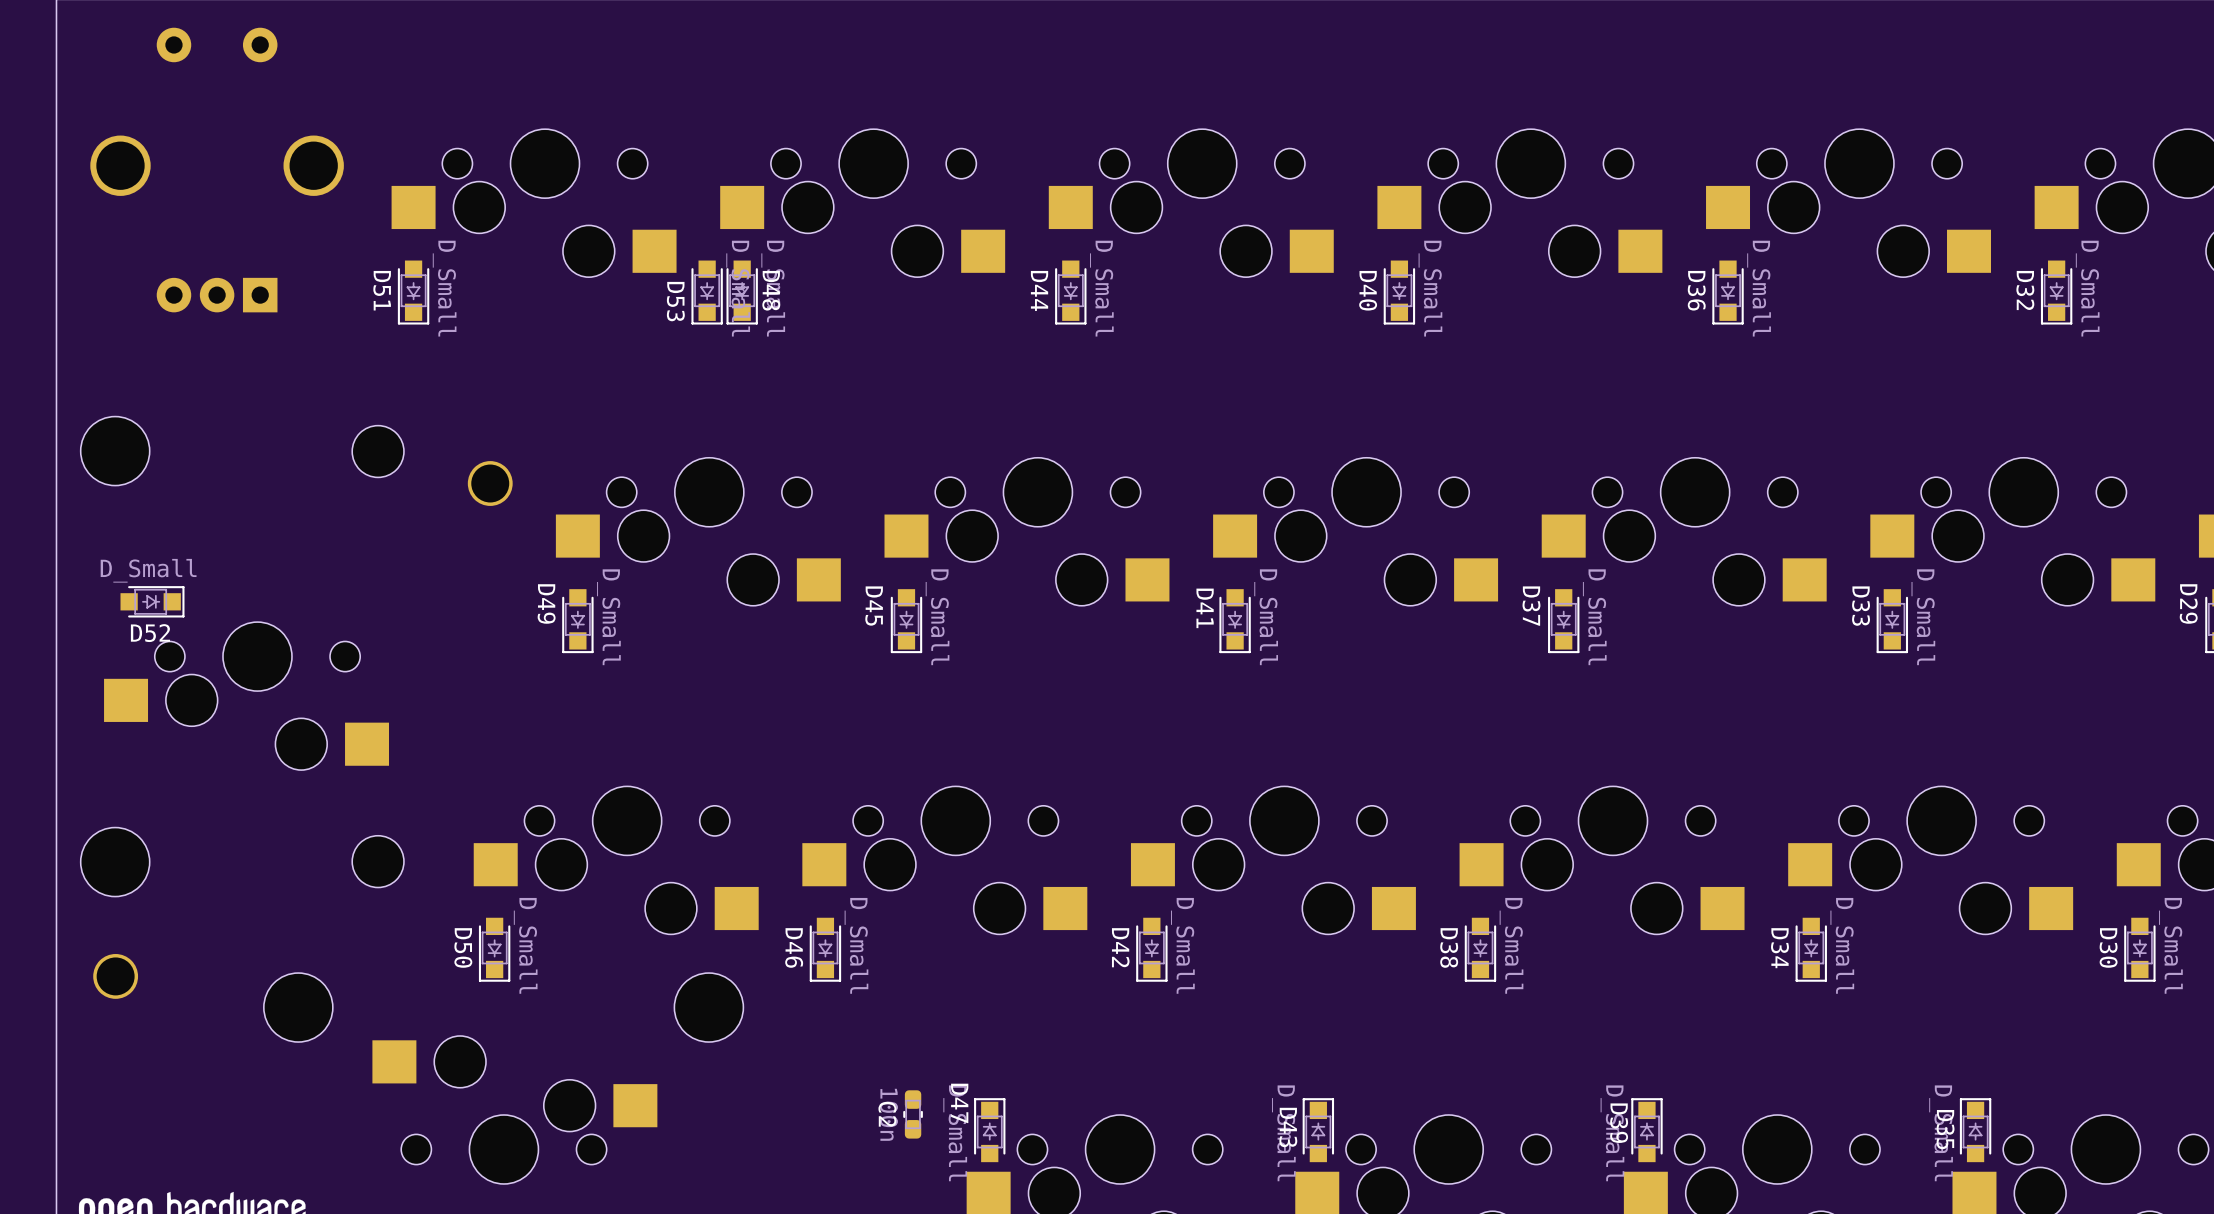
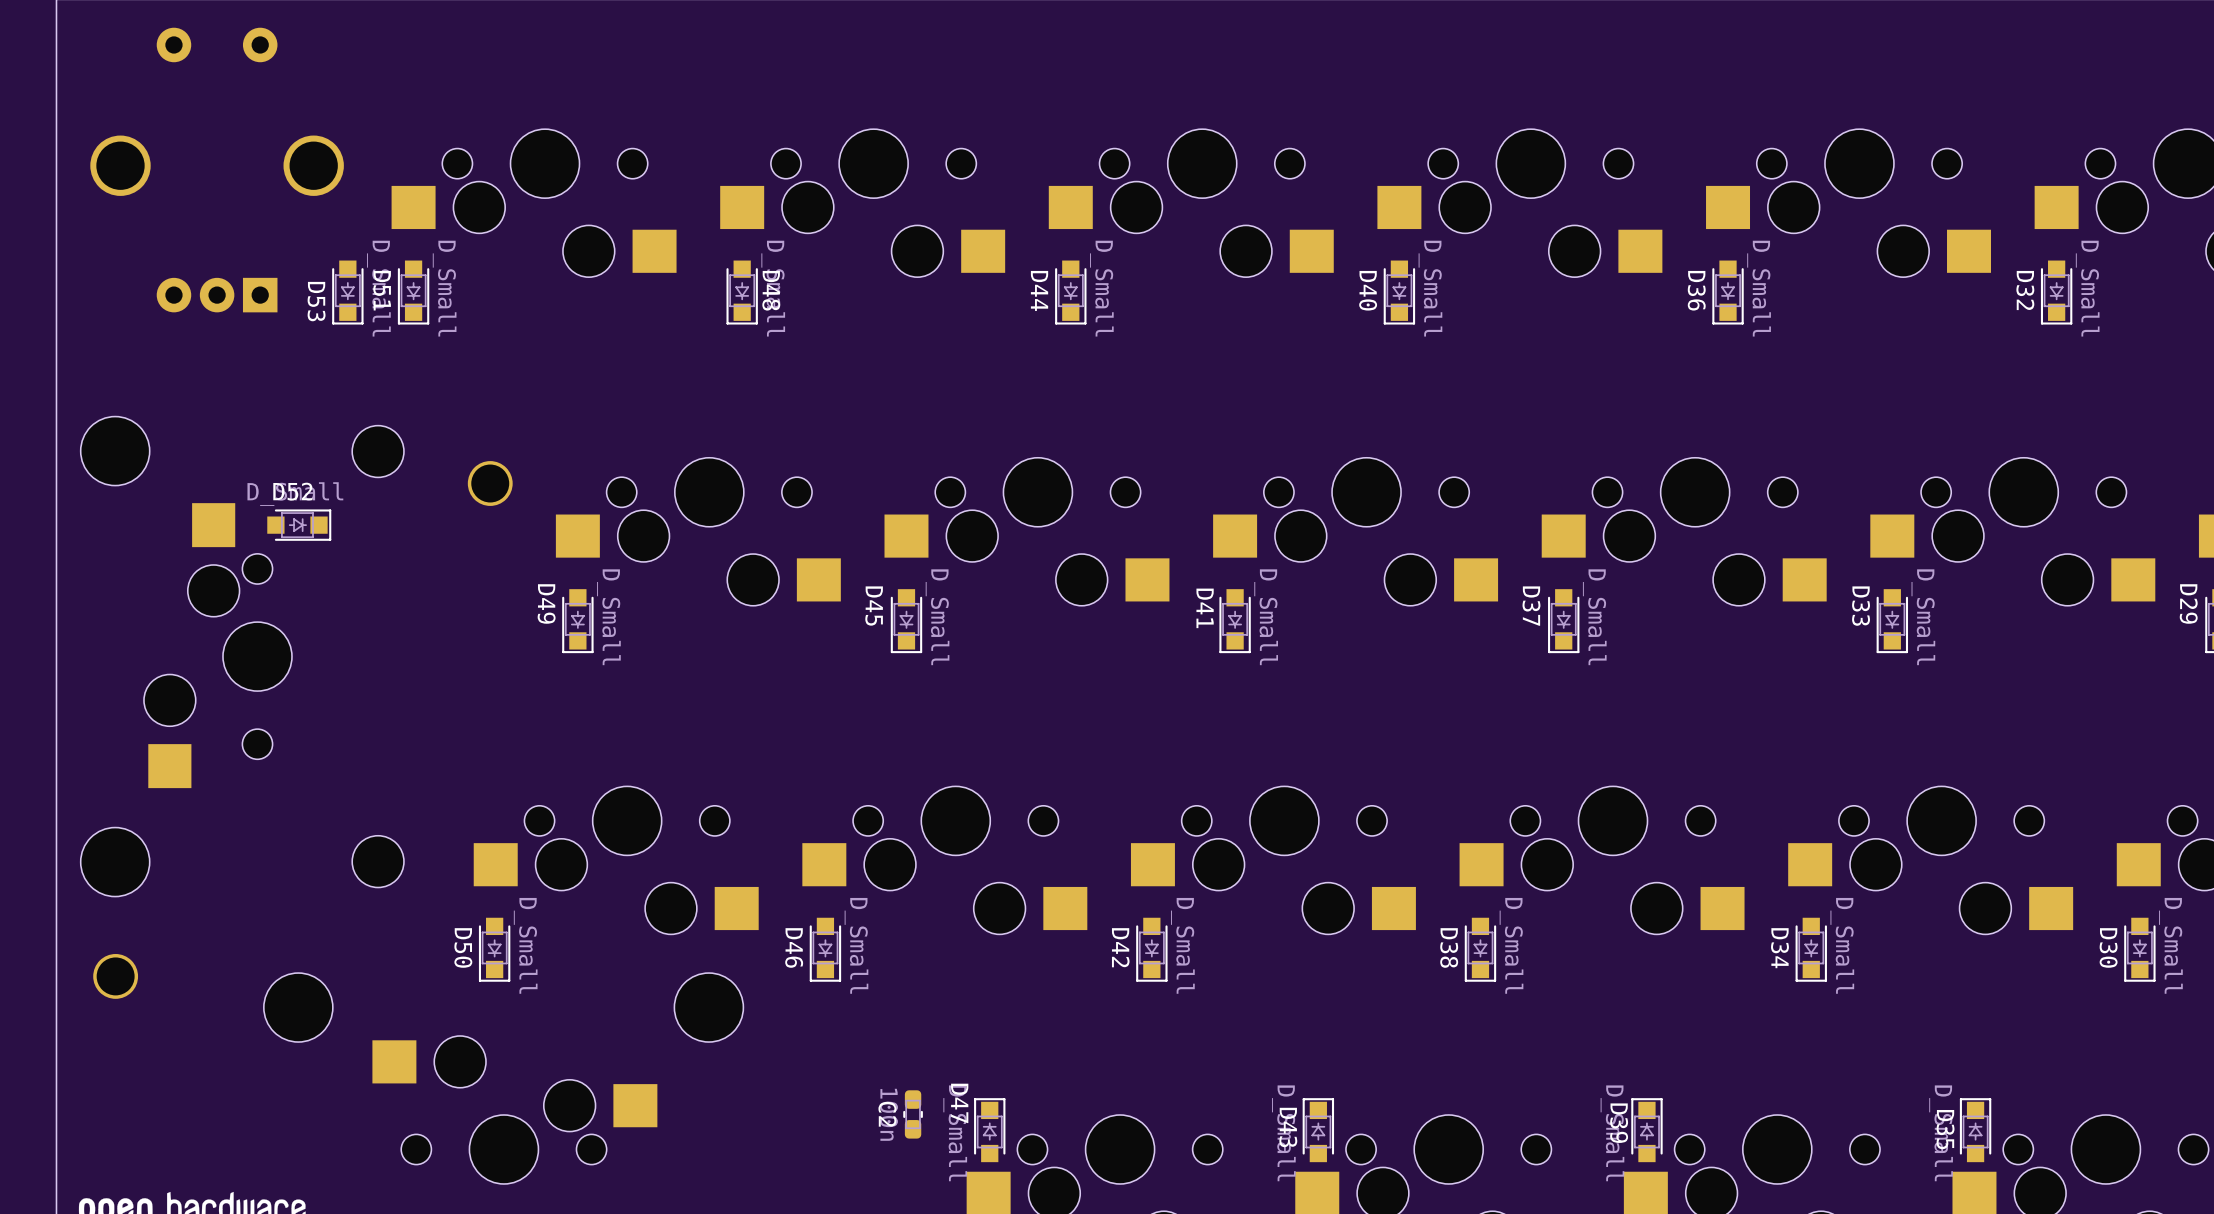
D53 position: (707, 292) -> (347, 292)
D52 position: (152, 601) -> (299, 525)
D52 name position: D52 (150, 633) -> D52 (292, 491)
part rotation: 0° (246, 696) -> 90° clockwise (217, 645)

